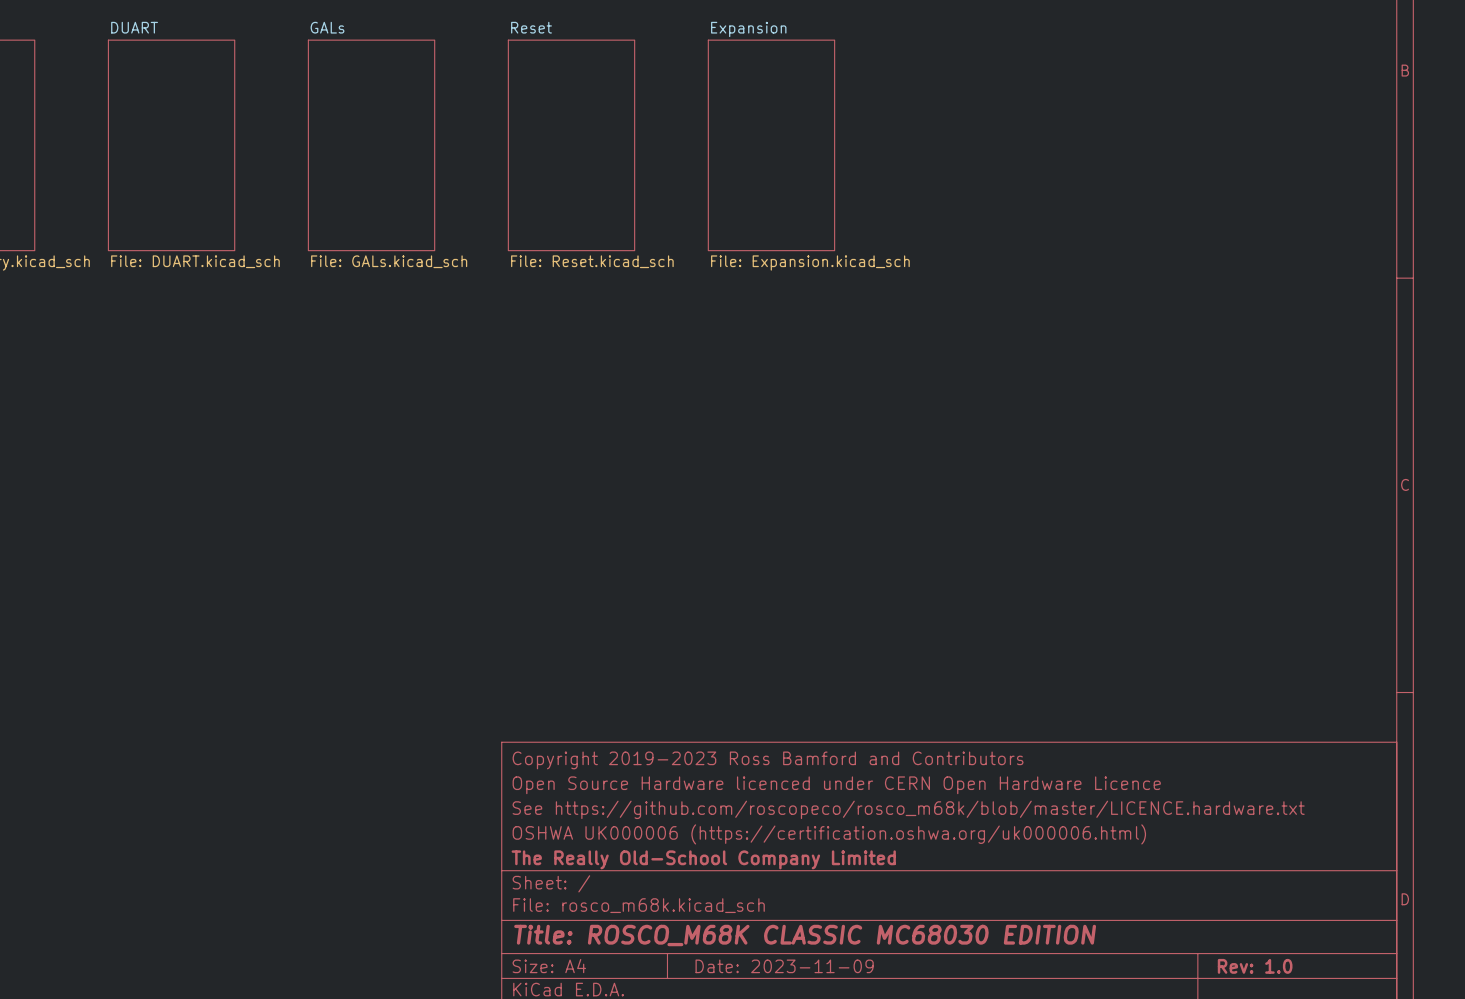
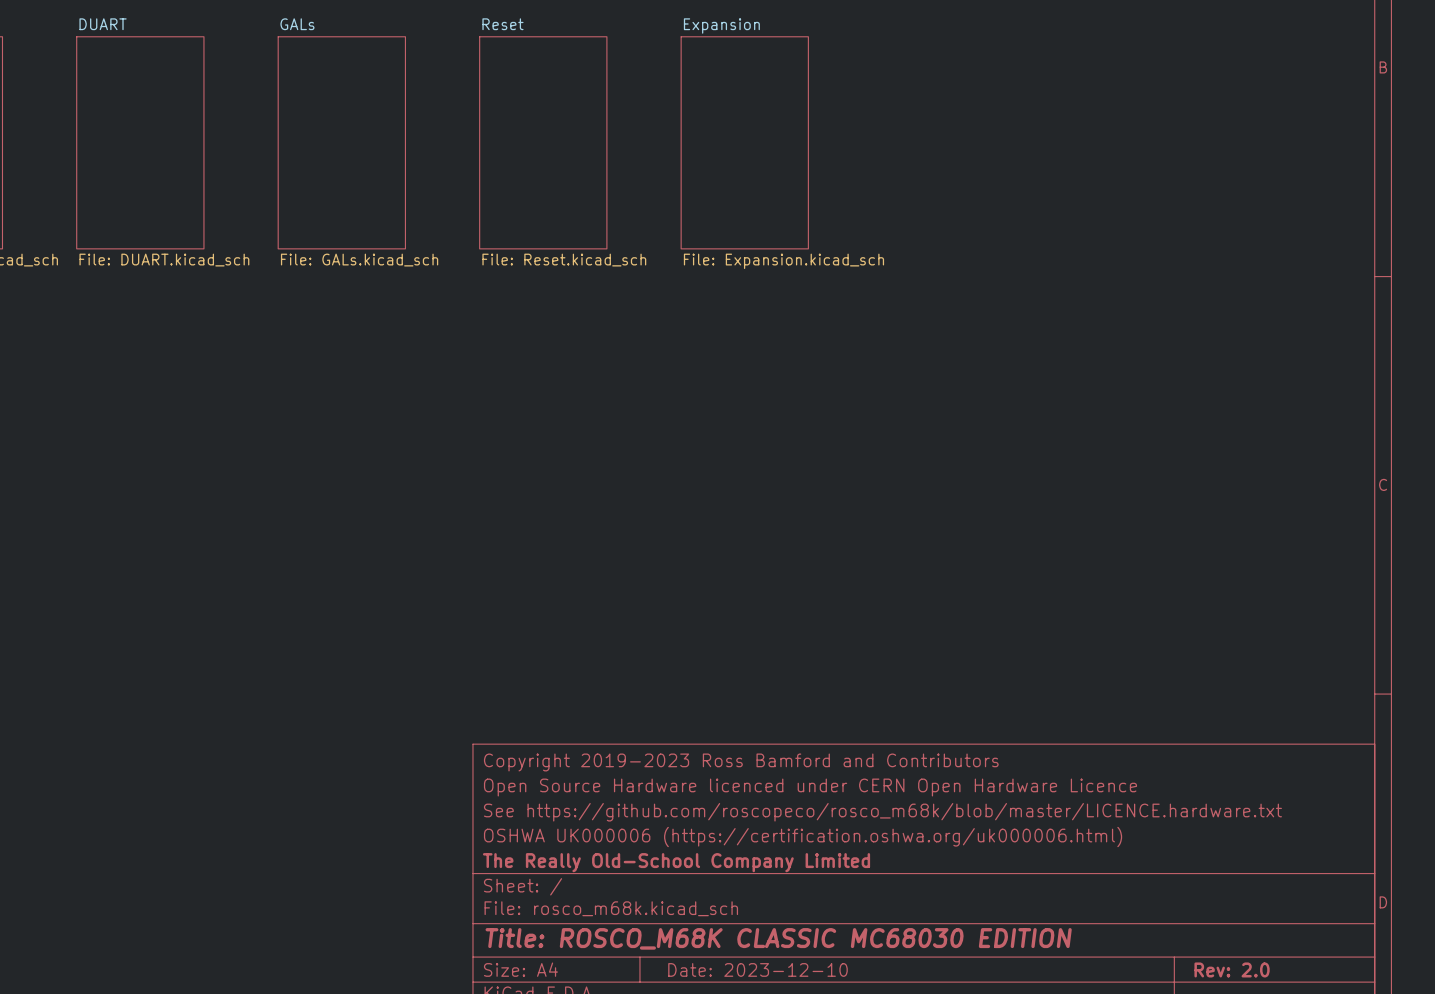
title block: Date: 2023-11-09 (784, 966) -> Date: 2023-12-10 (758, 969)
title block: Rev: 1.0 (1255, 966) -> Rev: 2.0 (1232, 969)

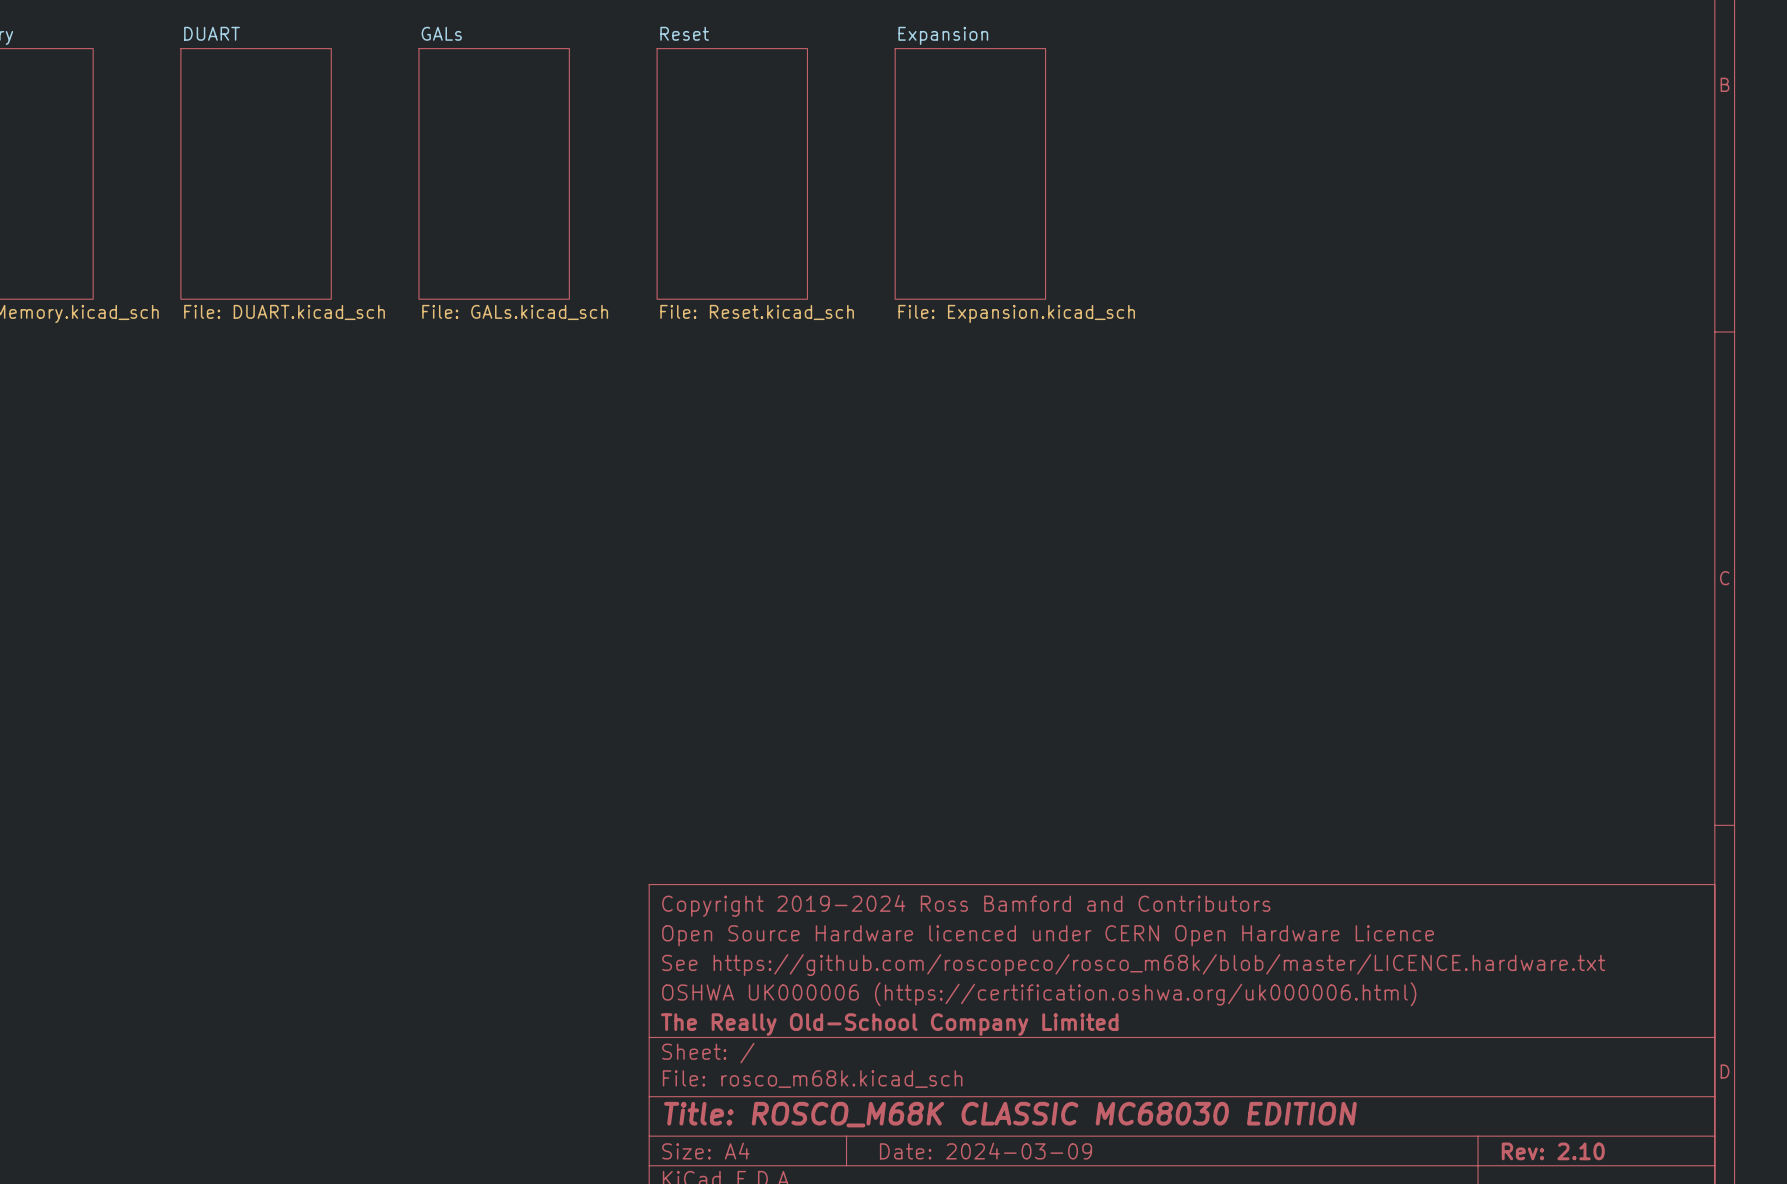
title block: Copyright 2019-2023 Ross Bamford and Contributors (741, 762) -> Copyright 2019-2024 Ross Bamford and Contributors (966, 905)
title block: Date: 2023-12-10 (758, 969) -> Date: 2024-03-09 (986, 1151)
title block: Rev: 2.0 (1232, 969) -> Rev: 2.10 (1553, 1151)

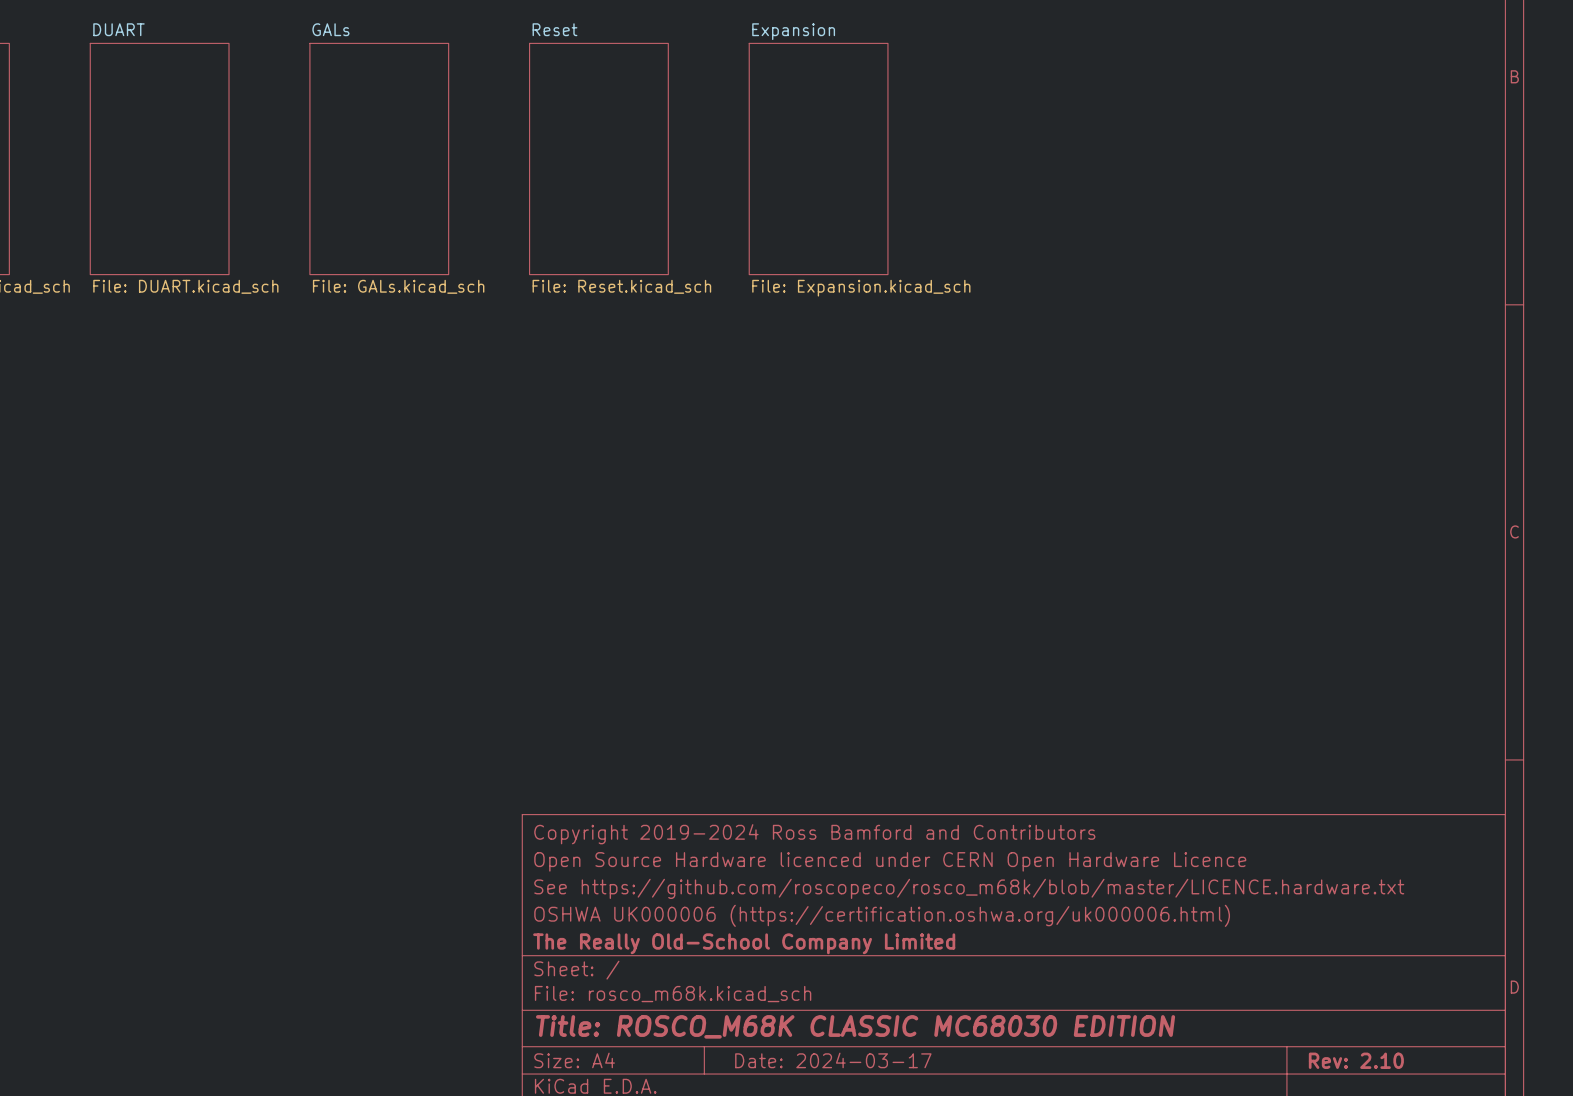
title block: Date: 2024-03-09 (986, 1151) -> Date: 2024-03-17 (833, 1060)

